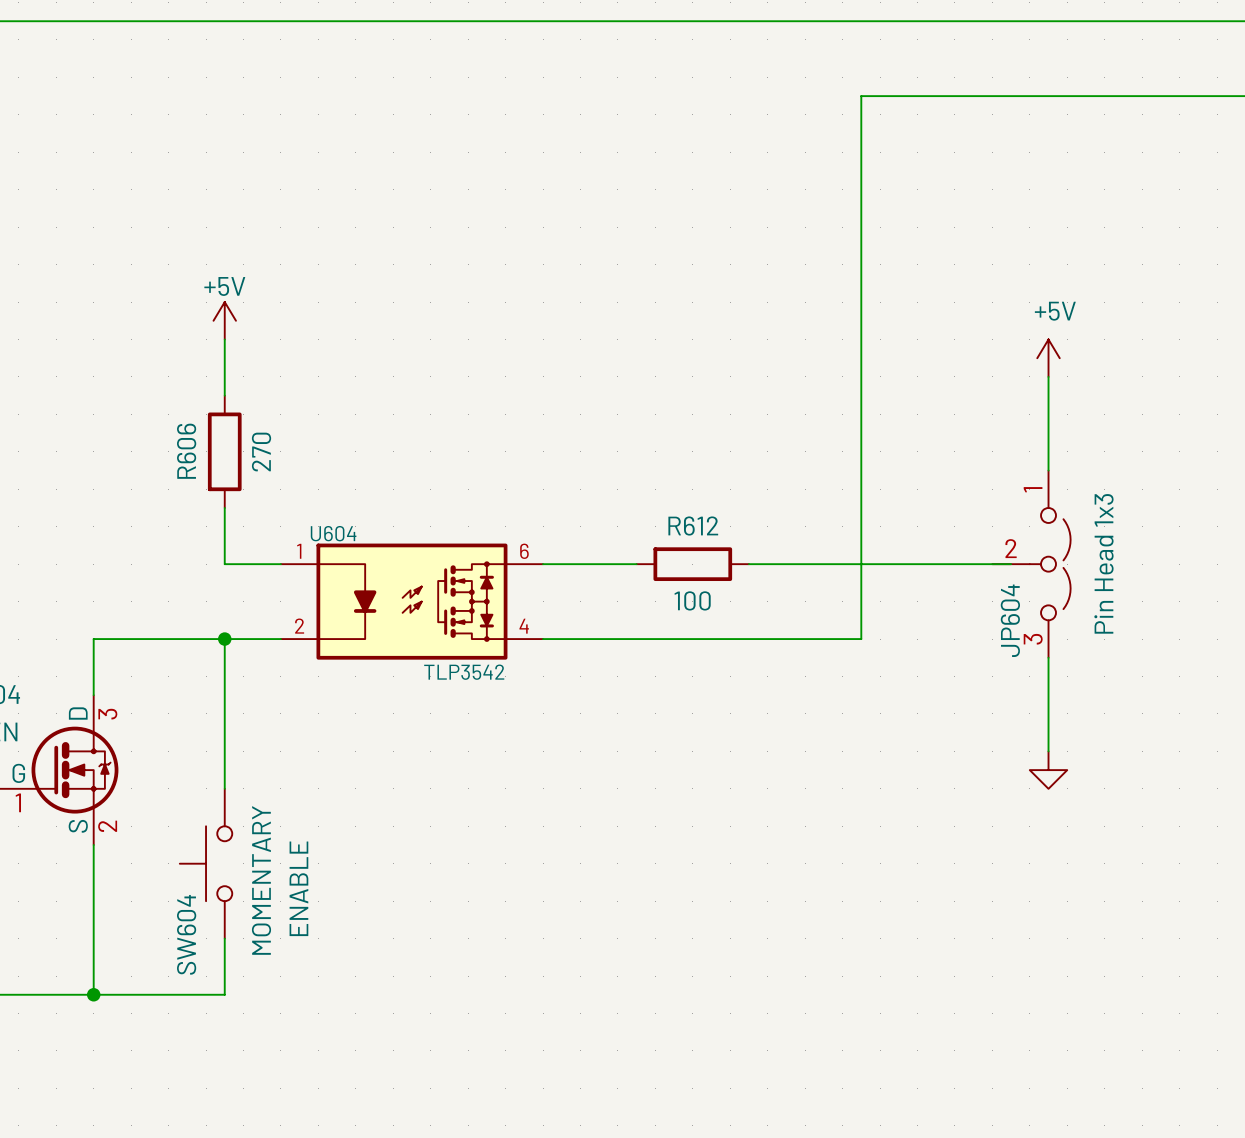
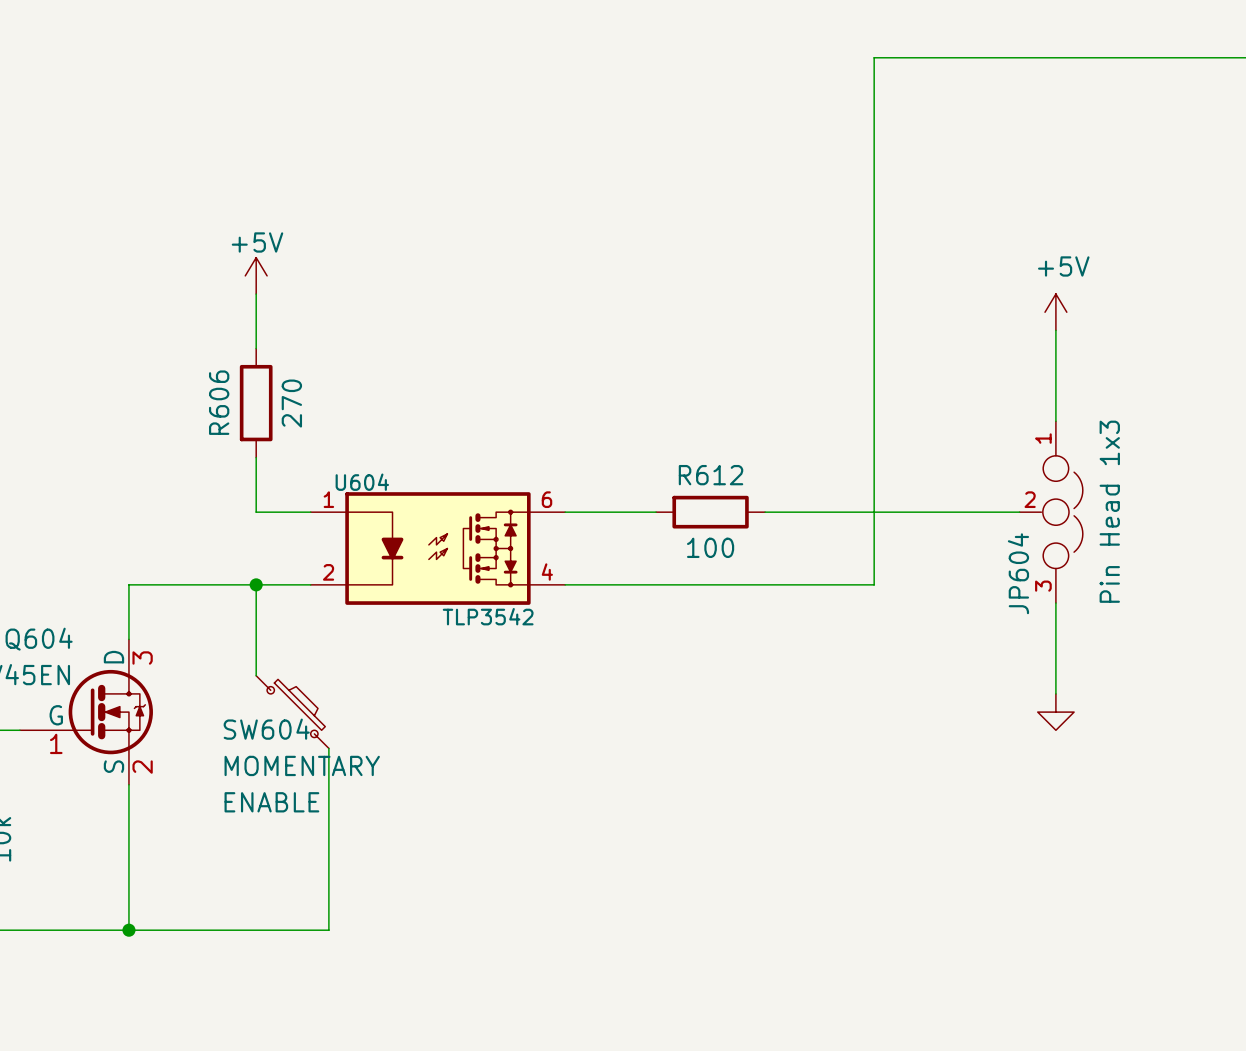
JP604 symbol: [992, 470, 1071, 658] -> [1019, 421, 1083, 604]
wire: (224, 732) (224, 788) -> none
SW604 symbol: [179, 788, 233, 939] -> [256, 675, 329, 749]
SW604 value position: MOMENTARY (261, 880) -> MOMENTARY (302, 765)
SW604 text position: ENABLE (298, 888) -> ENABLE (271, 802)
SW604 name position: SW604 (186, 934) -> SW604 (266, 729)
wire: (224, 938) (224, 994) -> (328, 748) (328, 930) (256, 930)

